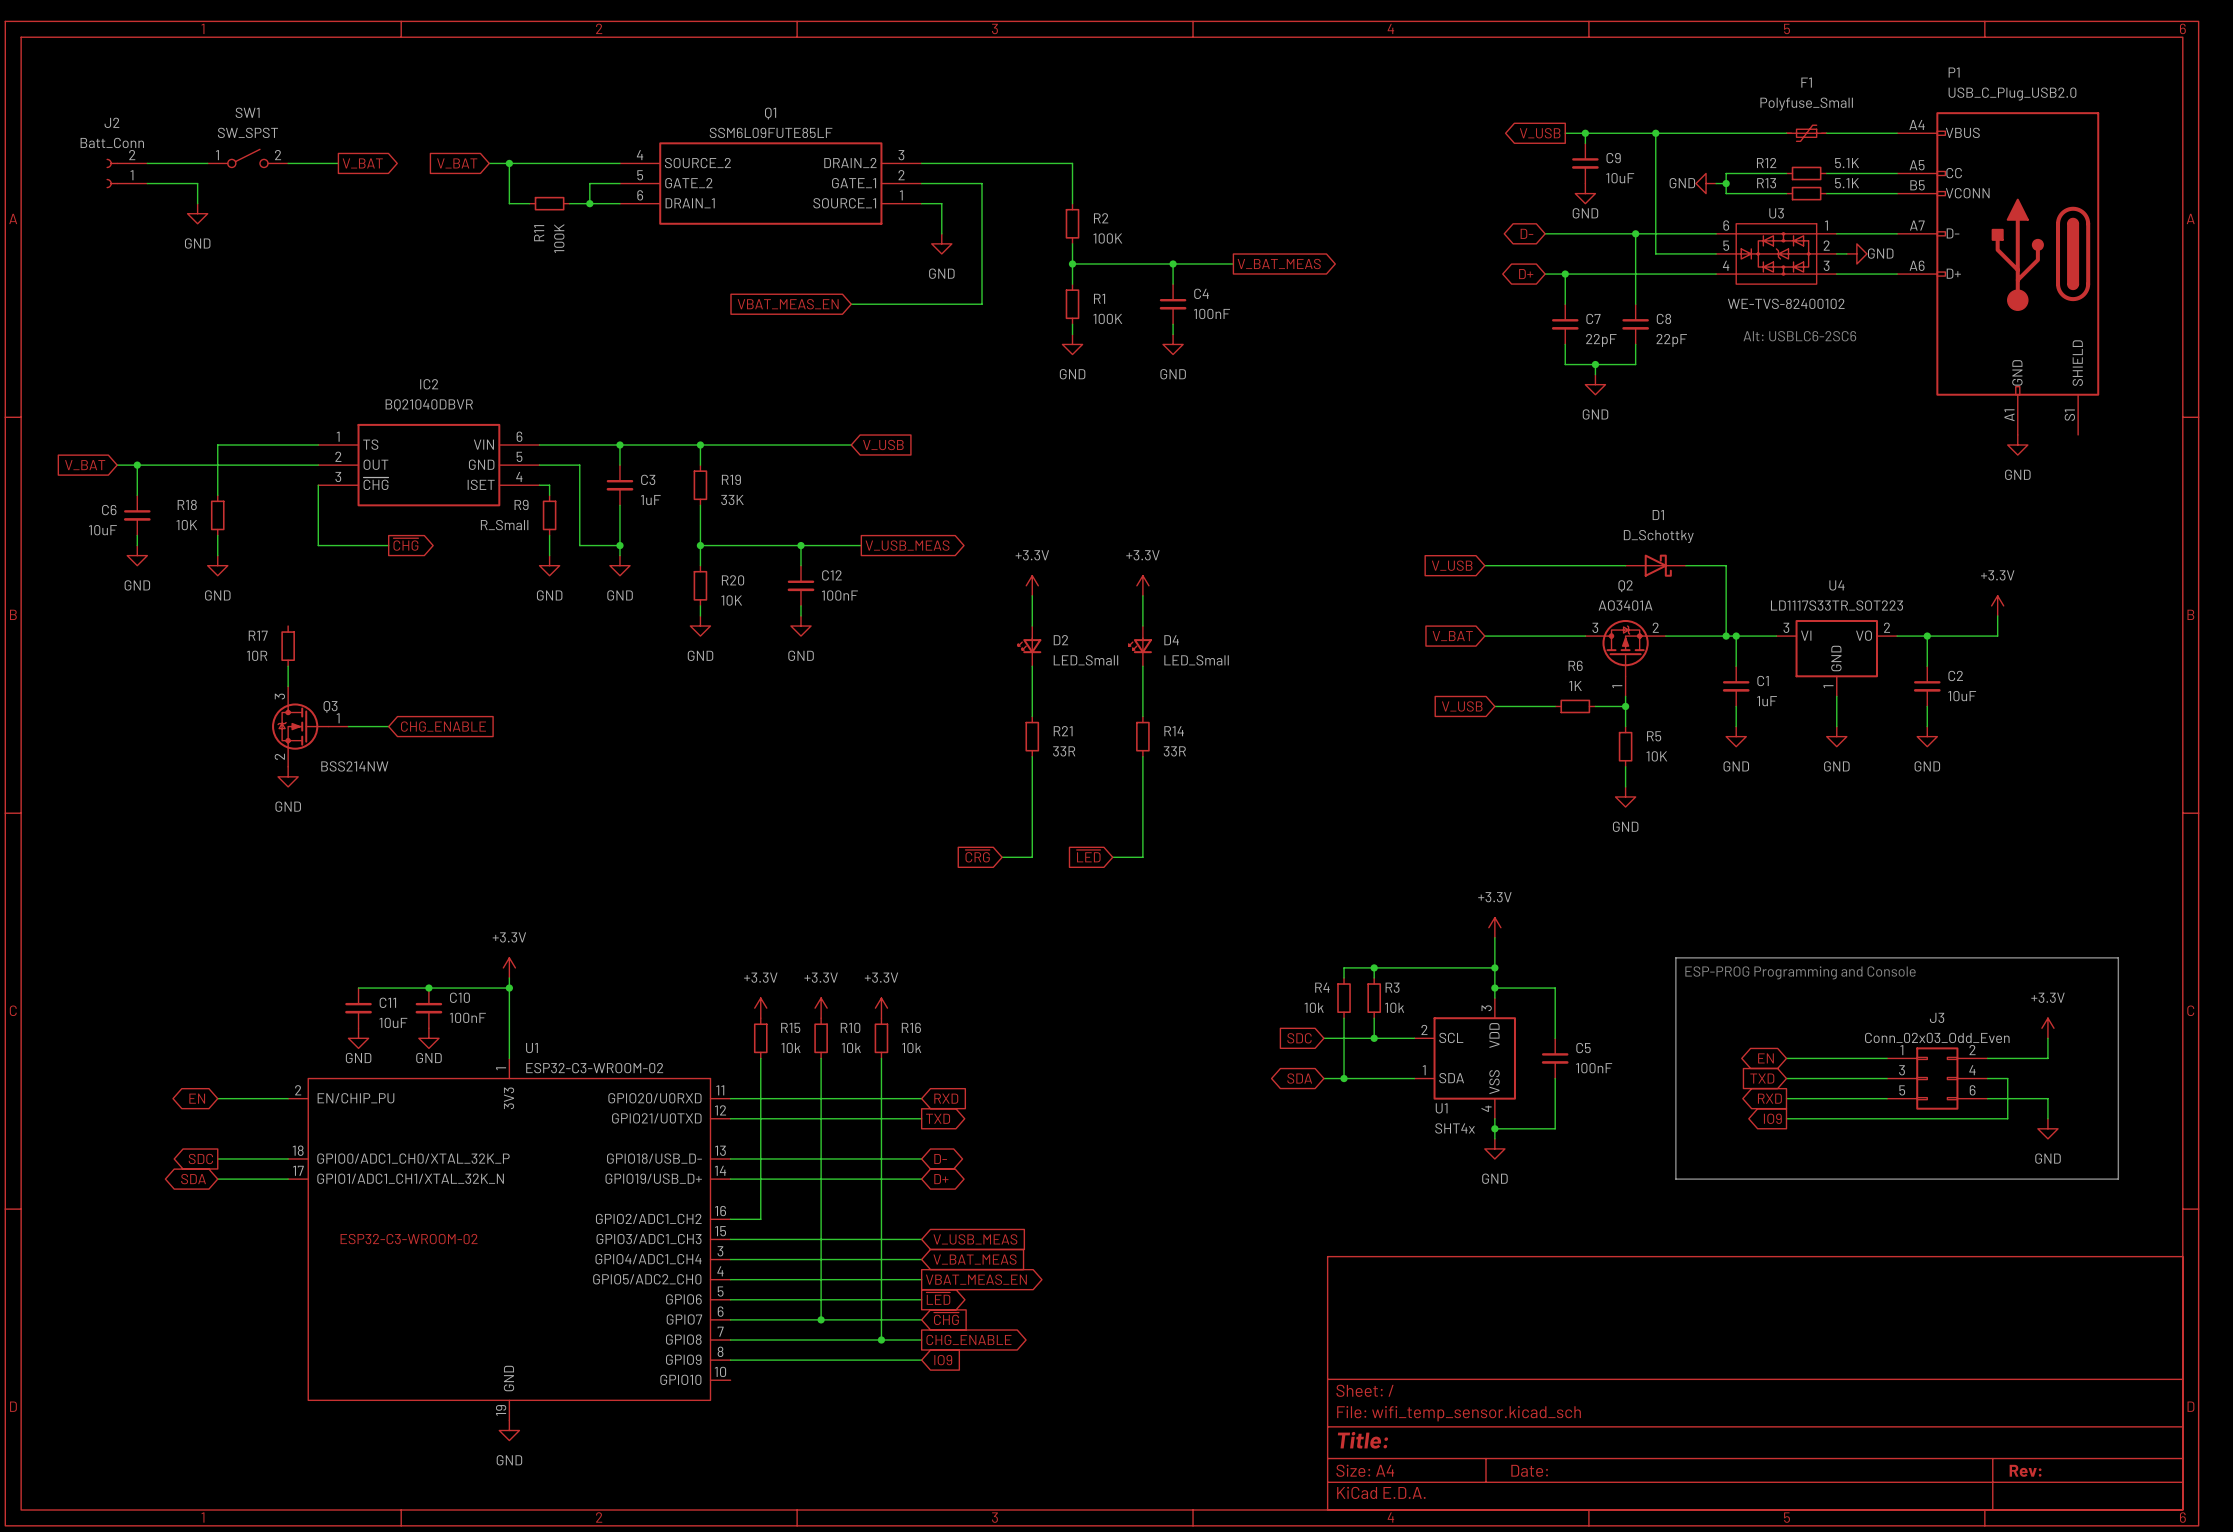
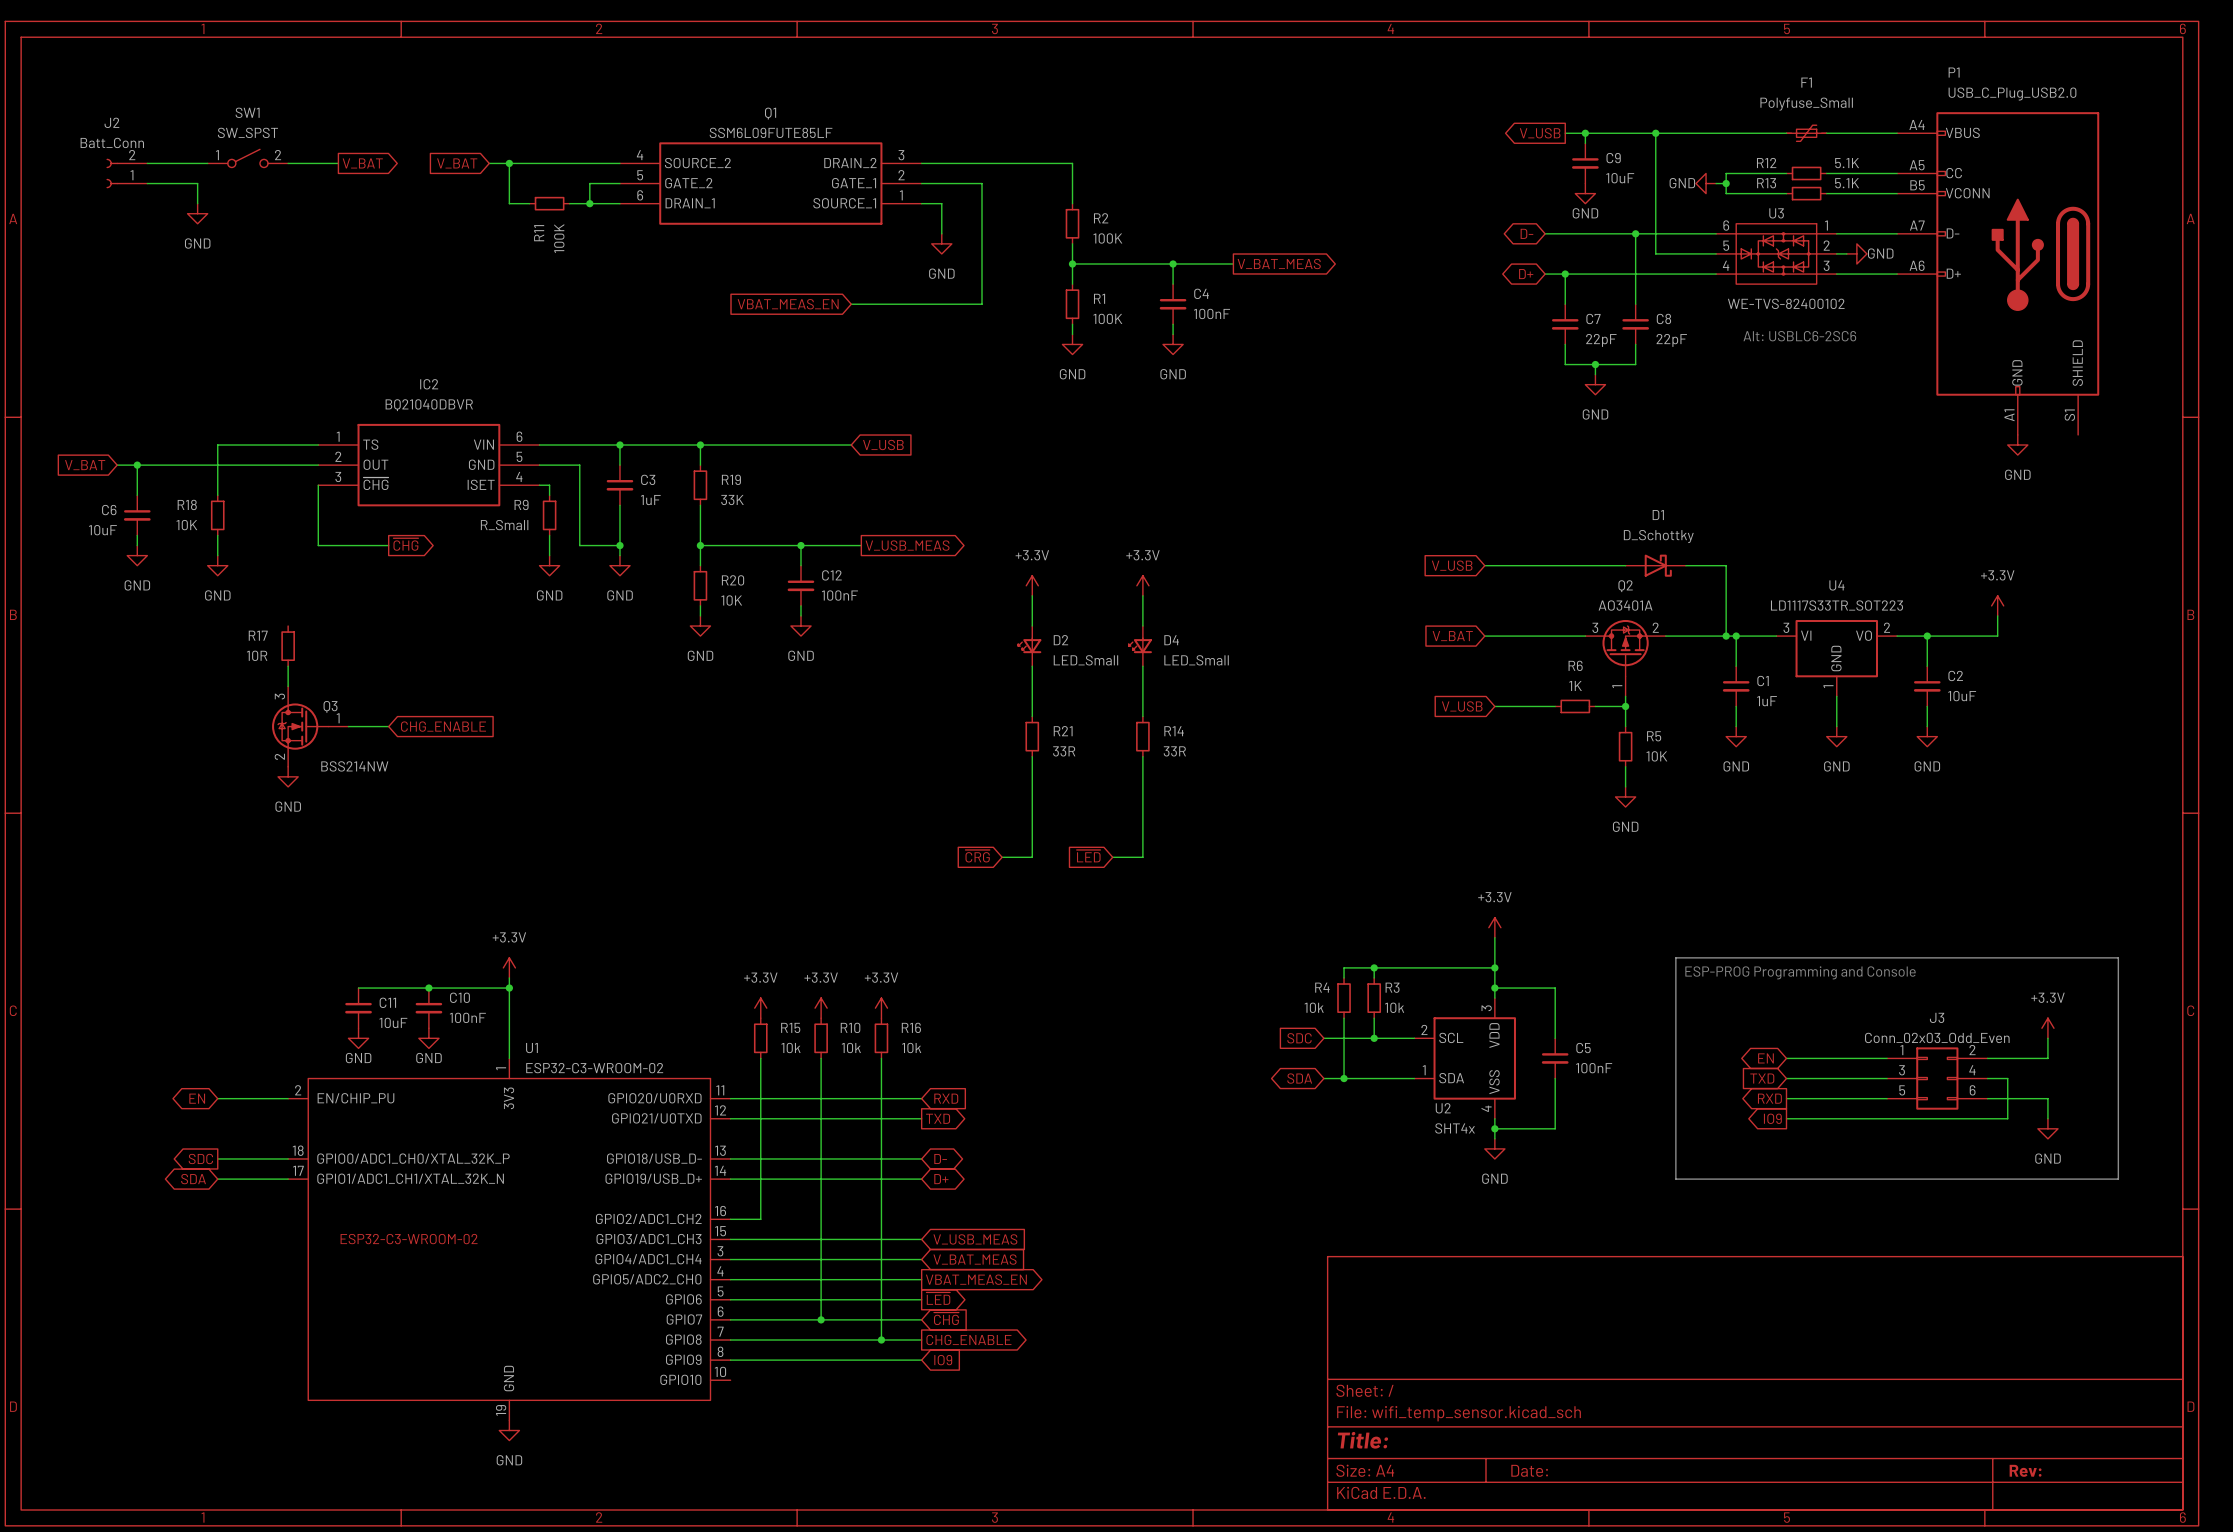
U1 name: U1 (1441, 1108) -> U2 (1443, 1108)

